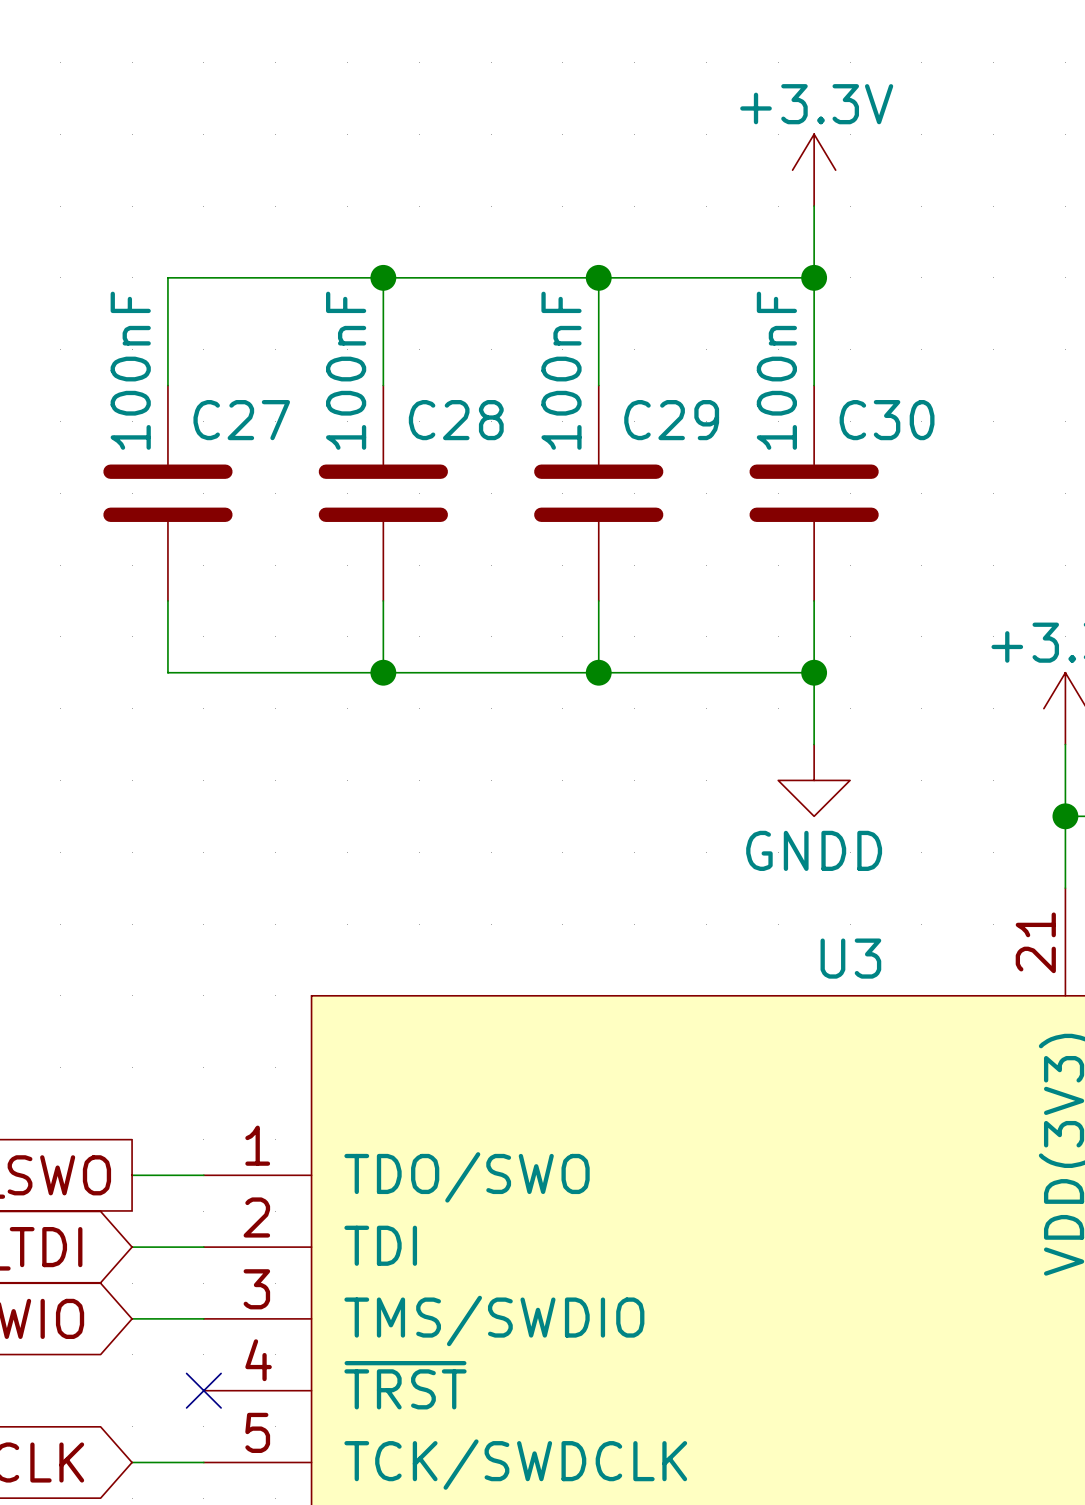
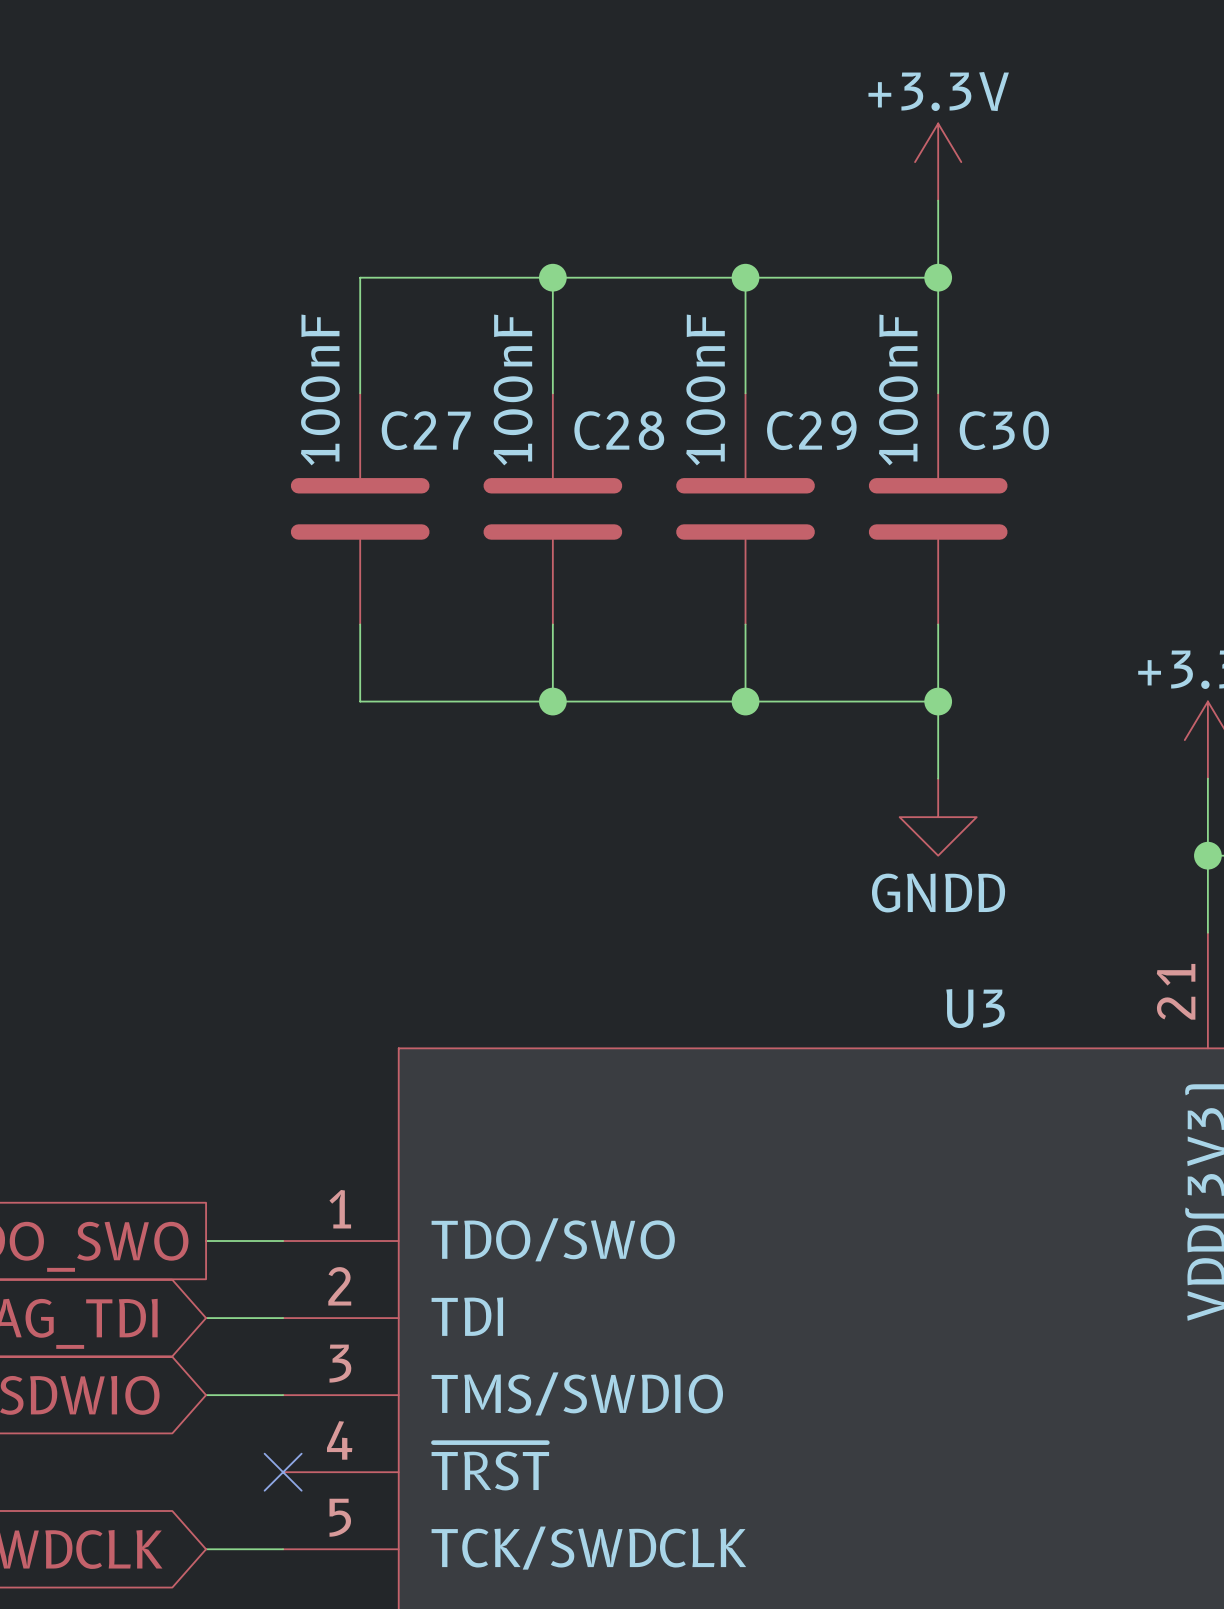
wire: (275, 277) (167, 277) (167, 385) -> (360, 277) (360, 393)
wire: (383, 277) (383, 385) -> (552, 277) (552, 393)
junction: (383, 277) -> none
junction: none -> (552, 277)
wire: (598, 277) (598, 385) -> (745, 277) (745, 393)
junction position: (598, 277) -> (745, 277)
C27 position: (167, 493) -> (360, 508)
C28 position: (383, 493) -> (552, 508)
C29 position: (598, 493) -> (745, 508)
wire: (167, 600) (167, 672) (275, 672) -> (360, 624) (360, 701)
wire: (383, 600) (383, 672) -> (552, 624) (552, 701)
wire: (598, 600) (598, 672) -> (745, 624) (745, 701)
junction: (383, 672) -> none
junction: none -> (552, 701)
junction position: (598, 672) -> (745, 701)

